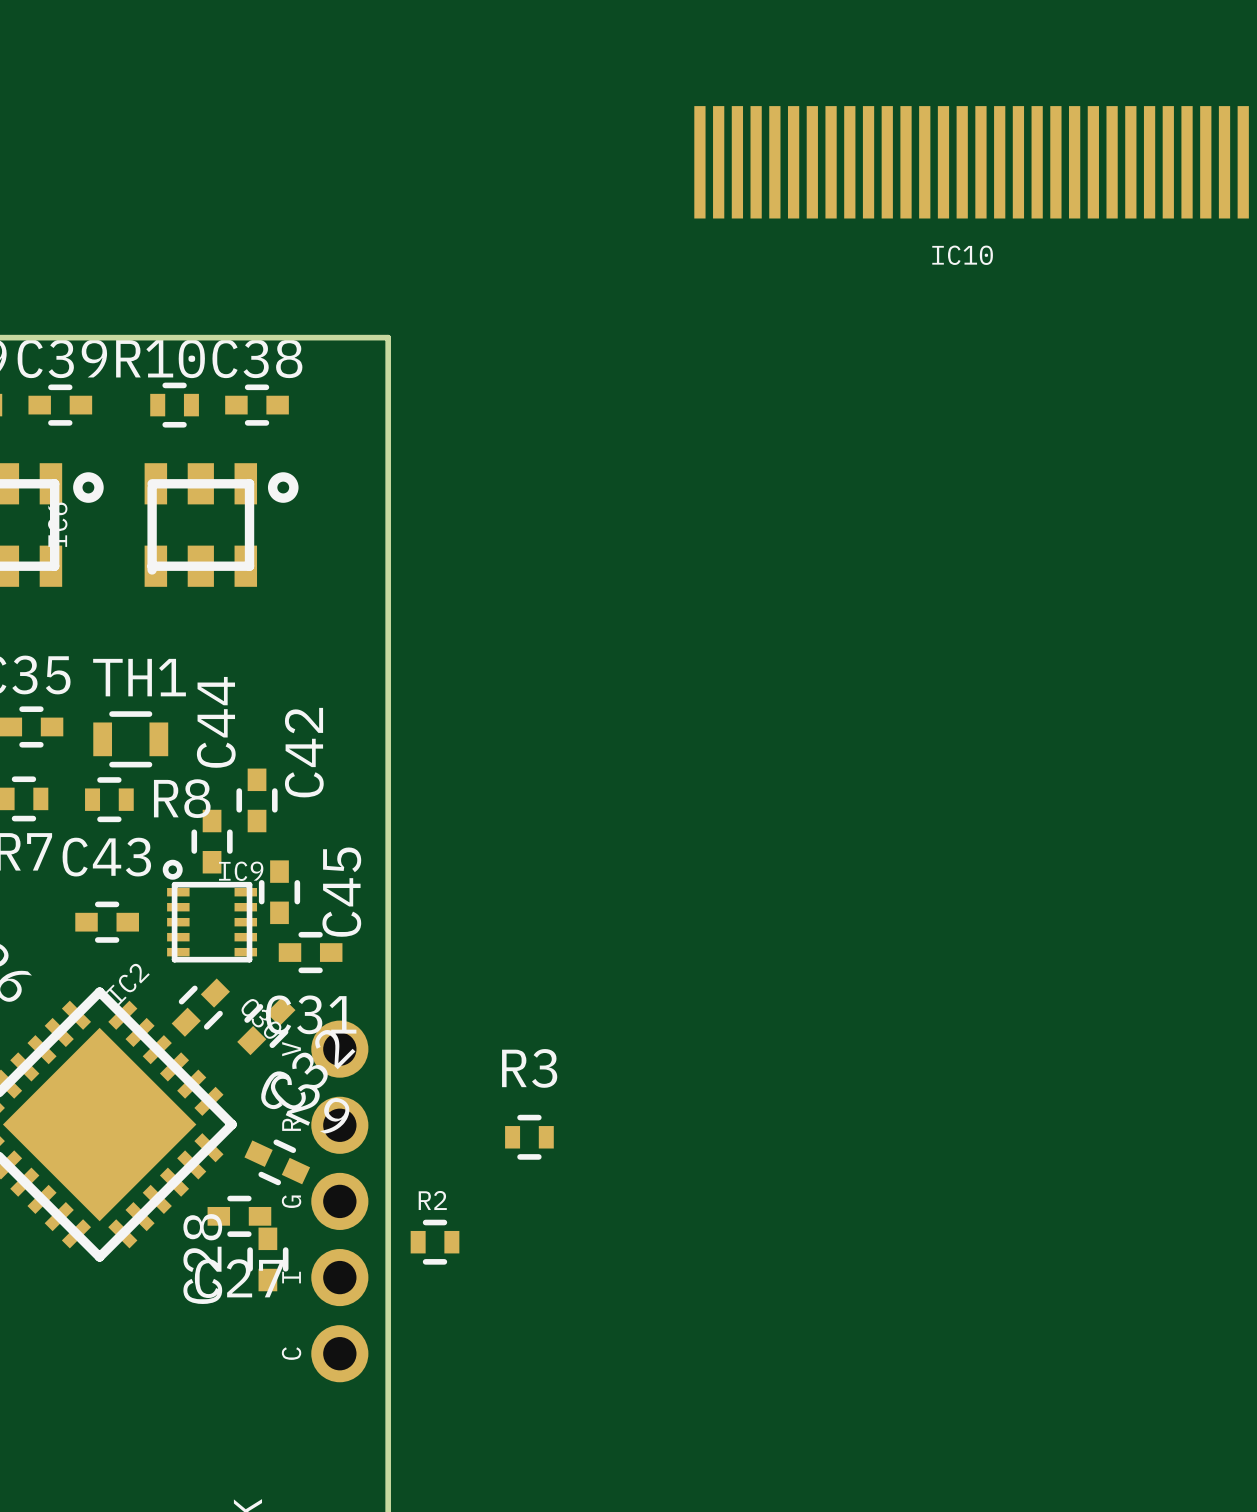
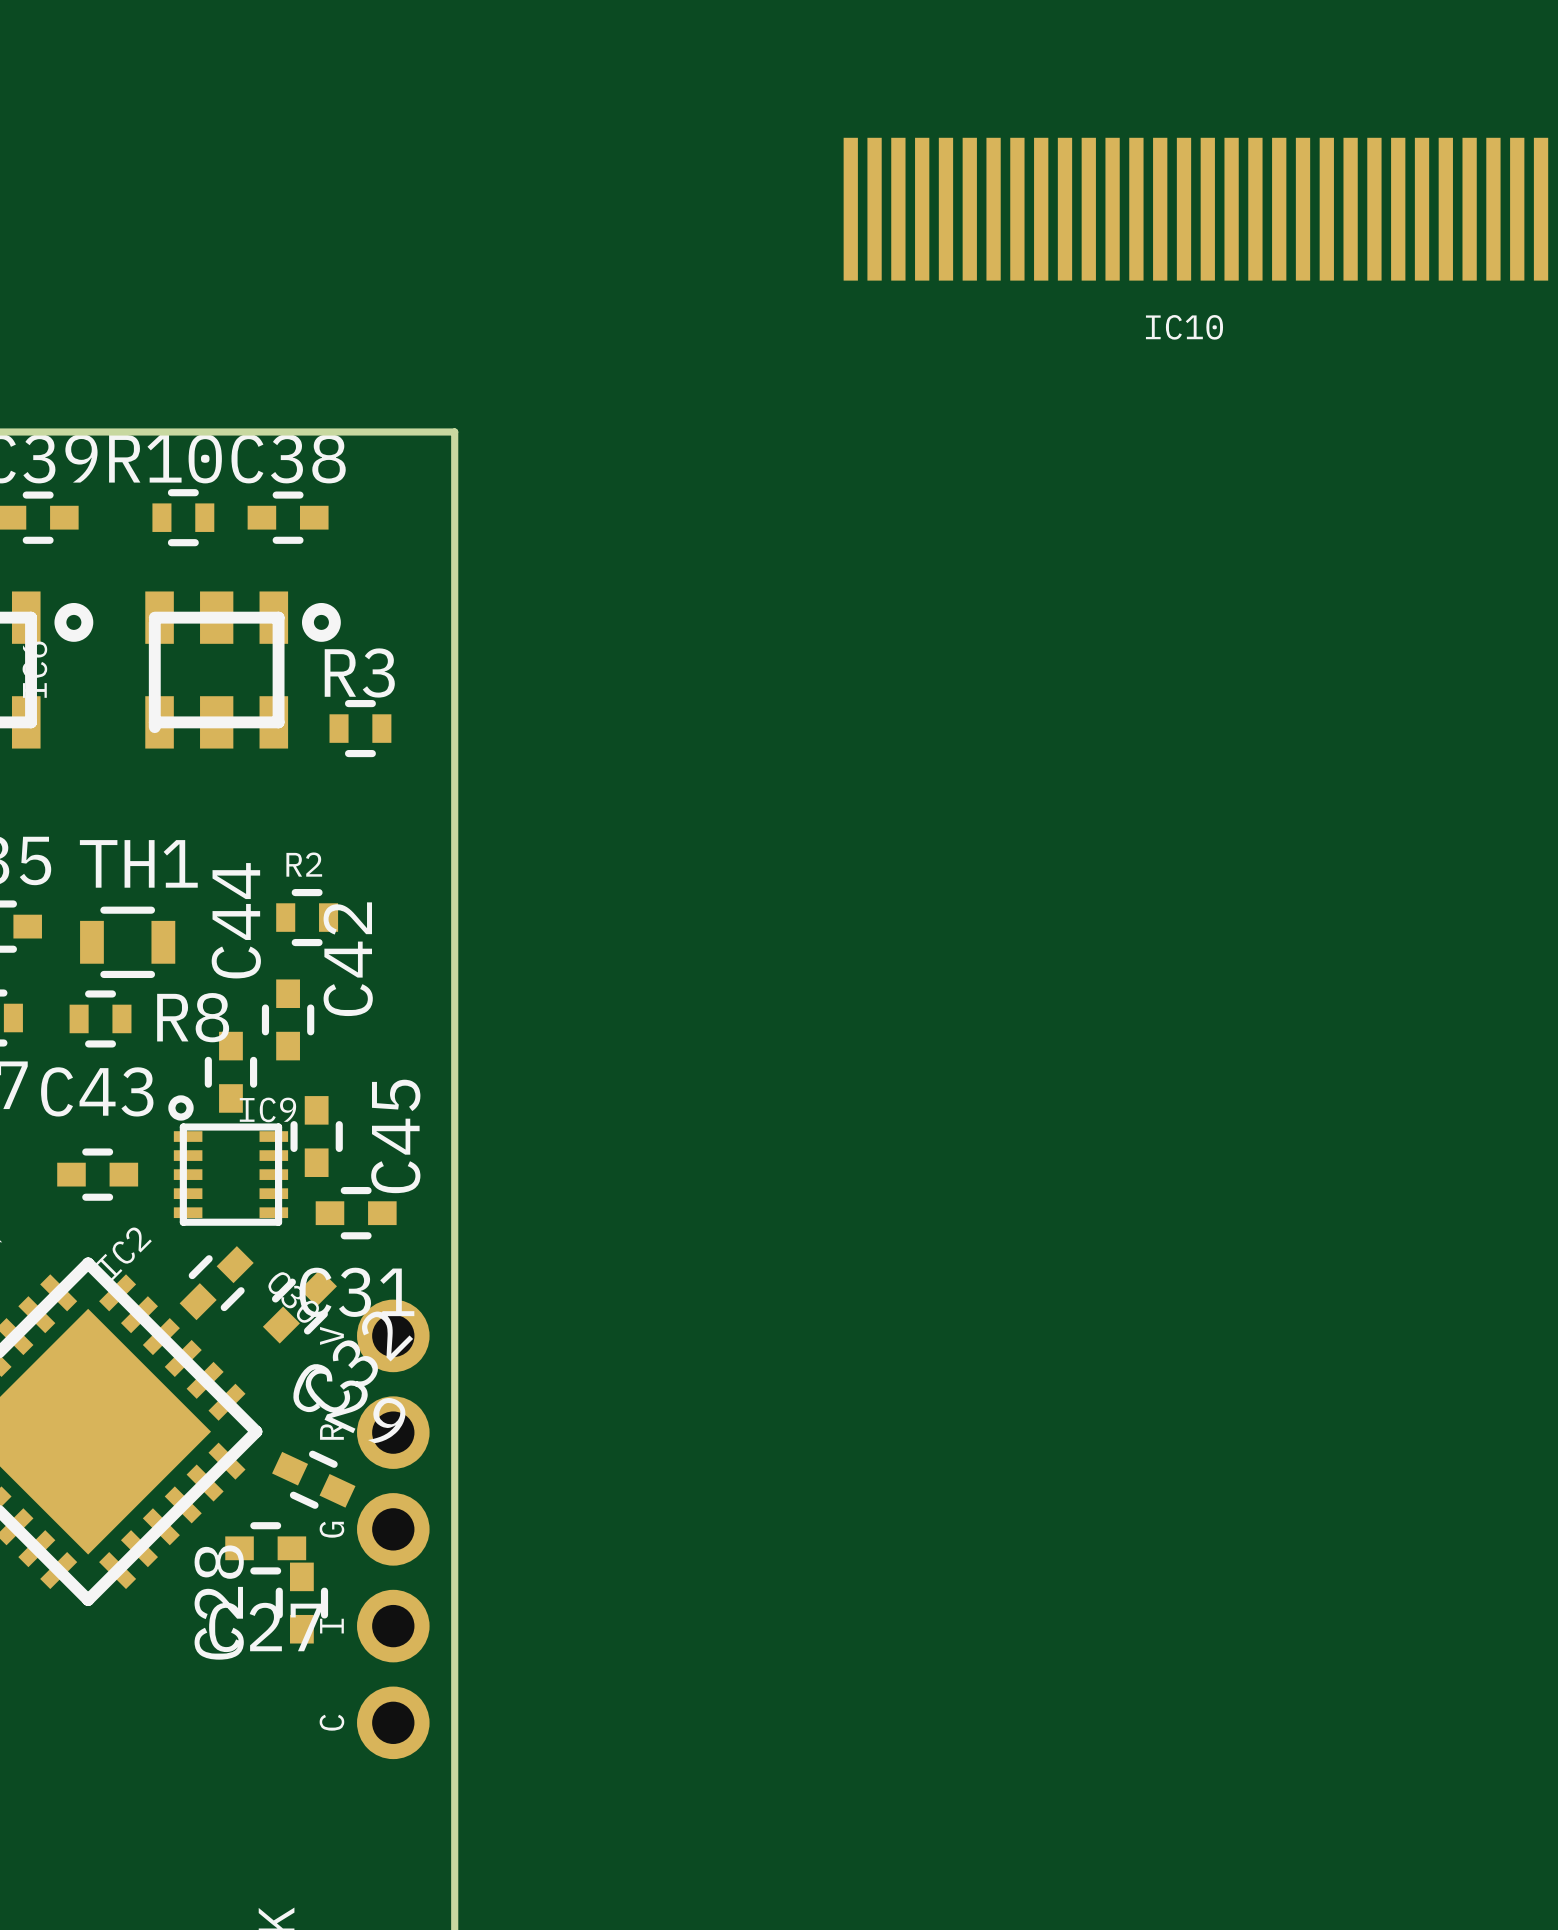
R3 name position: R3 (529, 1068) -> R3 (359, 672)
R3 position: (529, 1137) -> (360, 728)
R2 position: (435, 1242) -> (307, 917)

